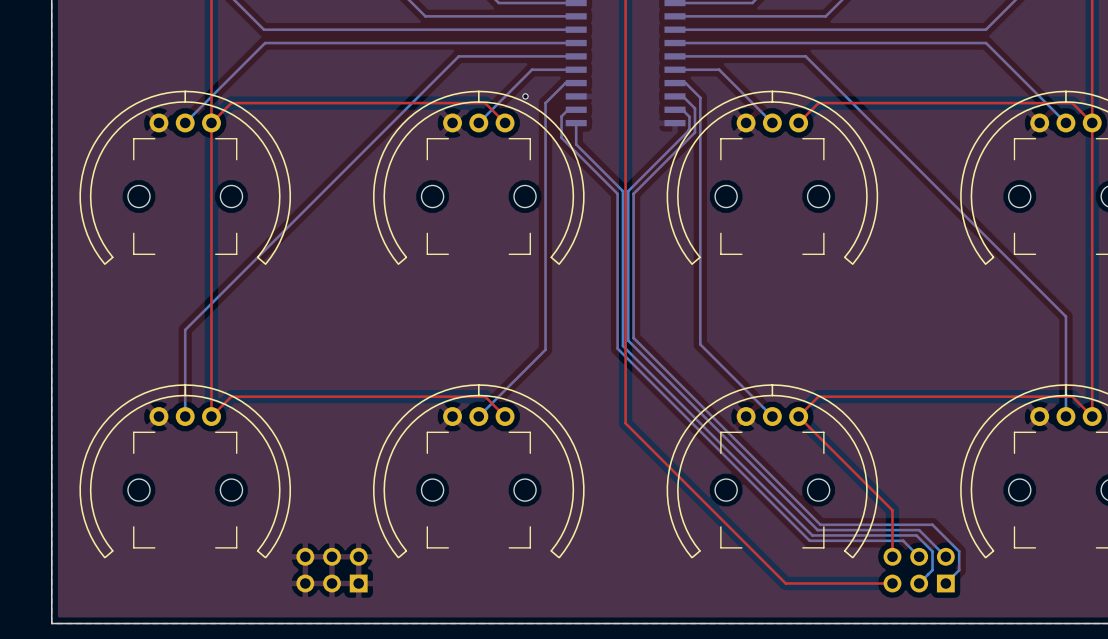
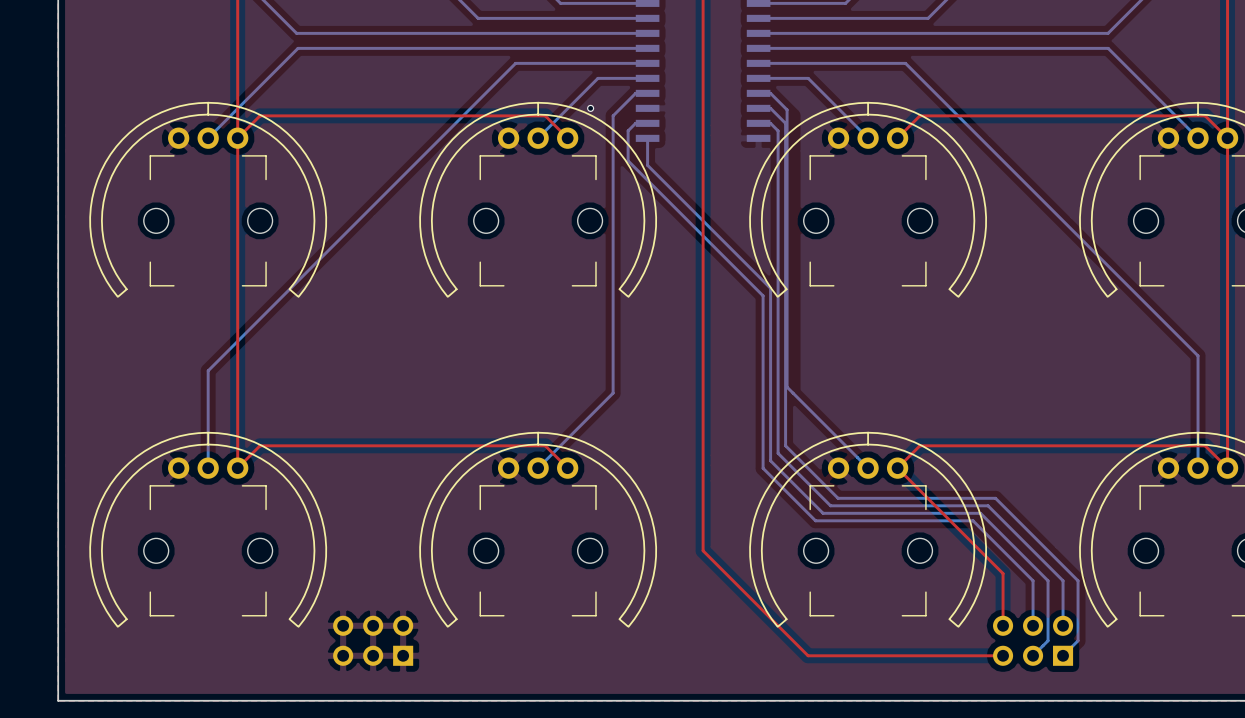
bottom track: (682, 96) (694, 108) (694, 132) (633, 193) (633, 337) (820, 524) (932, 524) (959, 551) -> (767, 108) (770, 108) (785, 123) (785, 445) (838, 498) (995, 498) (1078, 580) (1078, 619)
bottom track: (568, 109) (561, 116) (561, 137) (617, 193) (617, 348) (809, 540) (903, 540) (919, 556) -> (638, 123) (635, 123) (628, 130) (628, 160) (763, 295) (763, 468) (815, 520) (973, 520) (1033, 580) (1033, 625)
bottom track: (674, 109) (684, 111) (689, 116) (689, 130) (628, 191) (628, 340) (817, 530) (919, 530) (945, 556) -> (758, 123) (770, 123) (778, 130) (778, 453) (830, 505) (988, 505) (1063, 580) (1063, 625)
bottom track: (576, 144) (622, 191) (622, 345) (812, 535) (916, 535) (932, 551) -> (647, 162) (647, 165) (770, 288) (770, 460) (823, 513) (980, 513) (1048, 580) (1048, 619)
top track: (625, 423) (785, 583) -> (703, 475) (703, 550) (808, 655) (883, 655)

